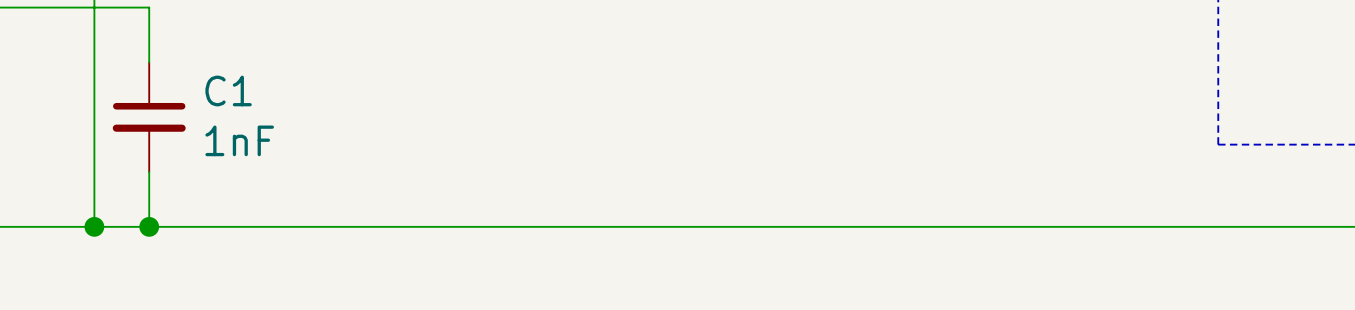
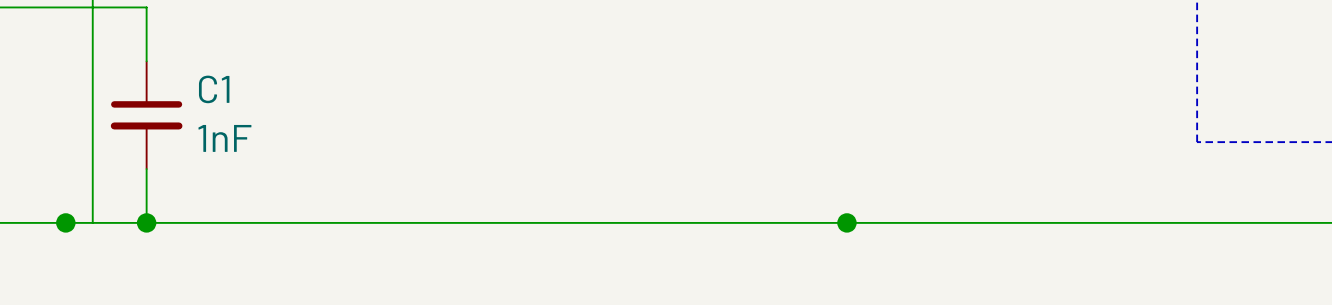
junction position: (94, 226) -> (65, 222)
junction: none -> (846, 222)

